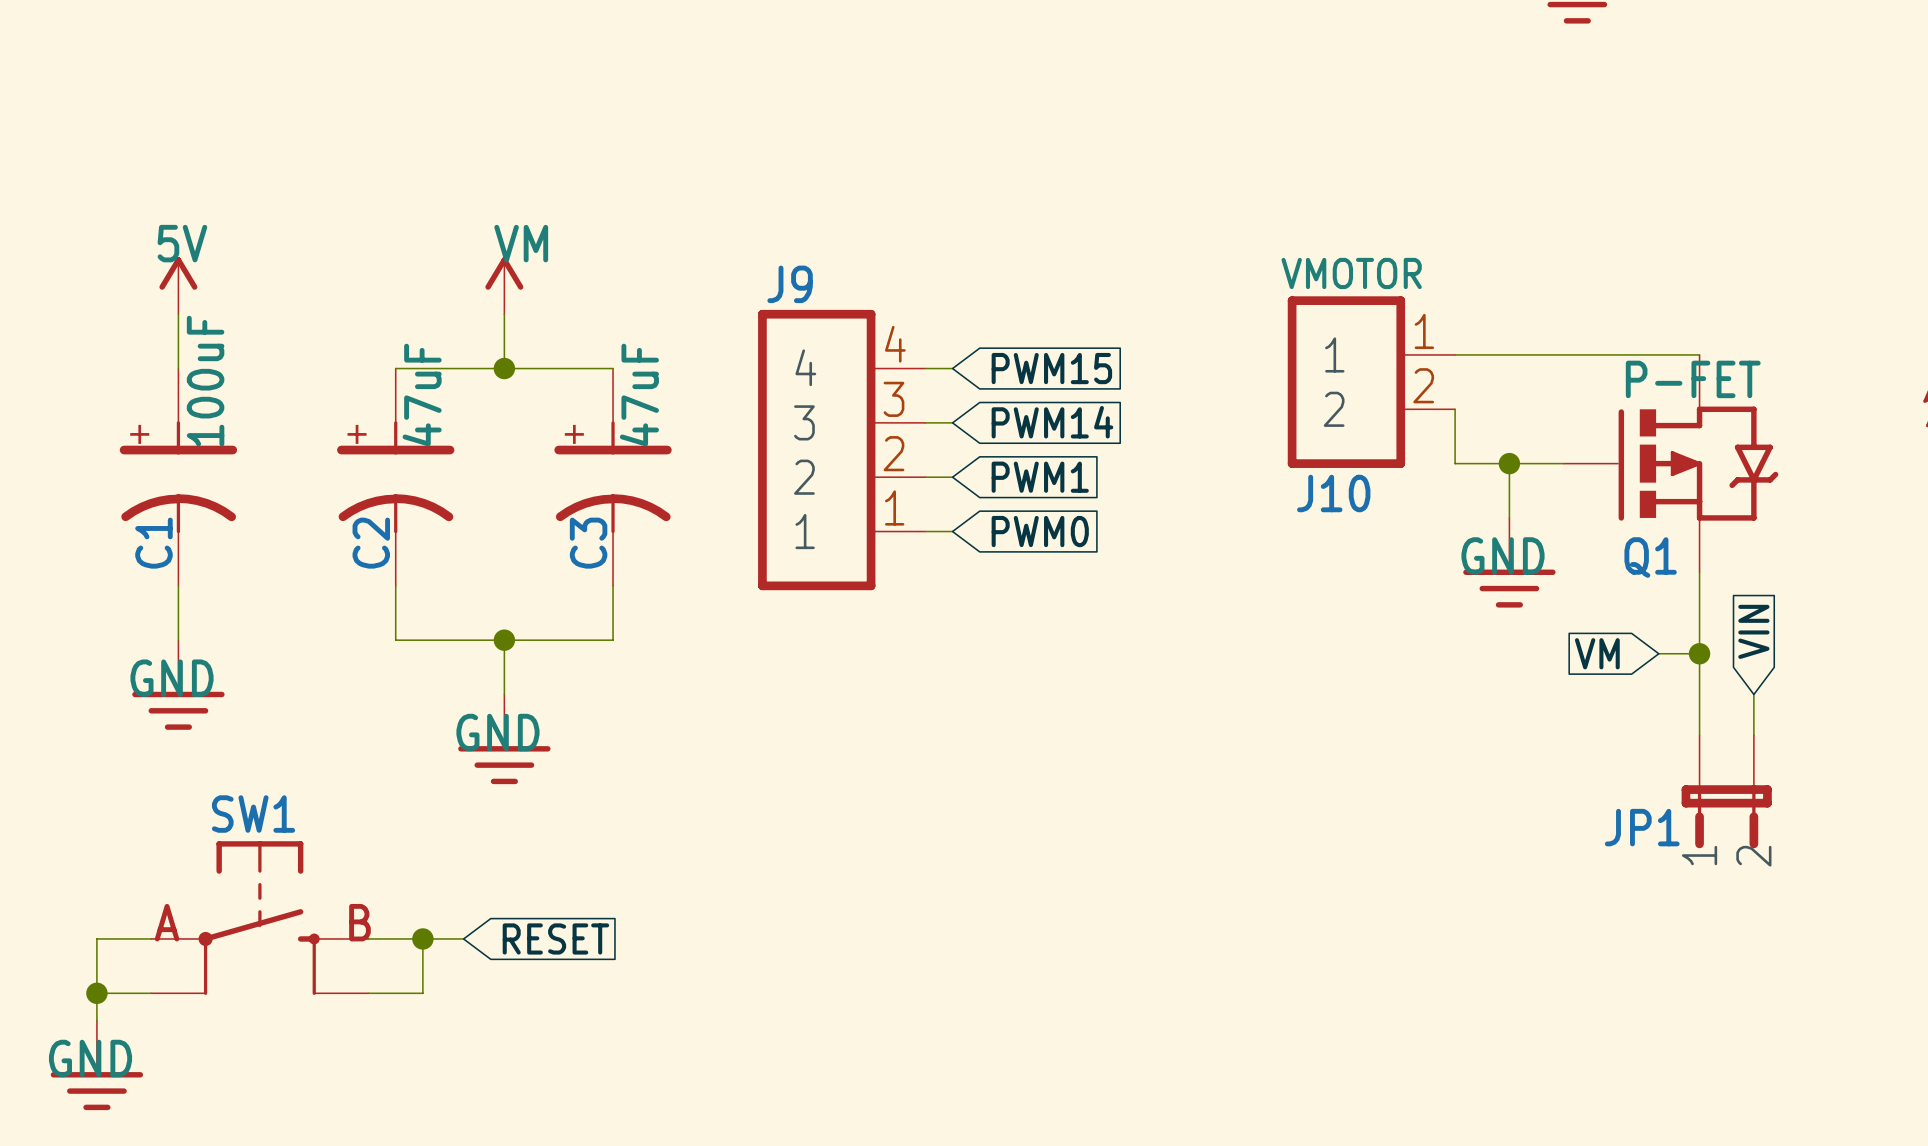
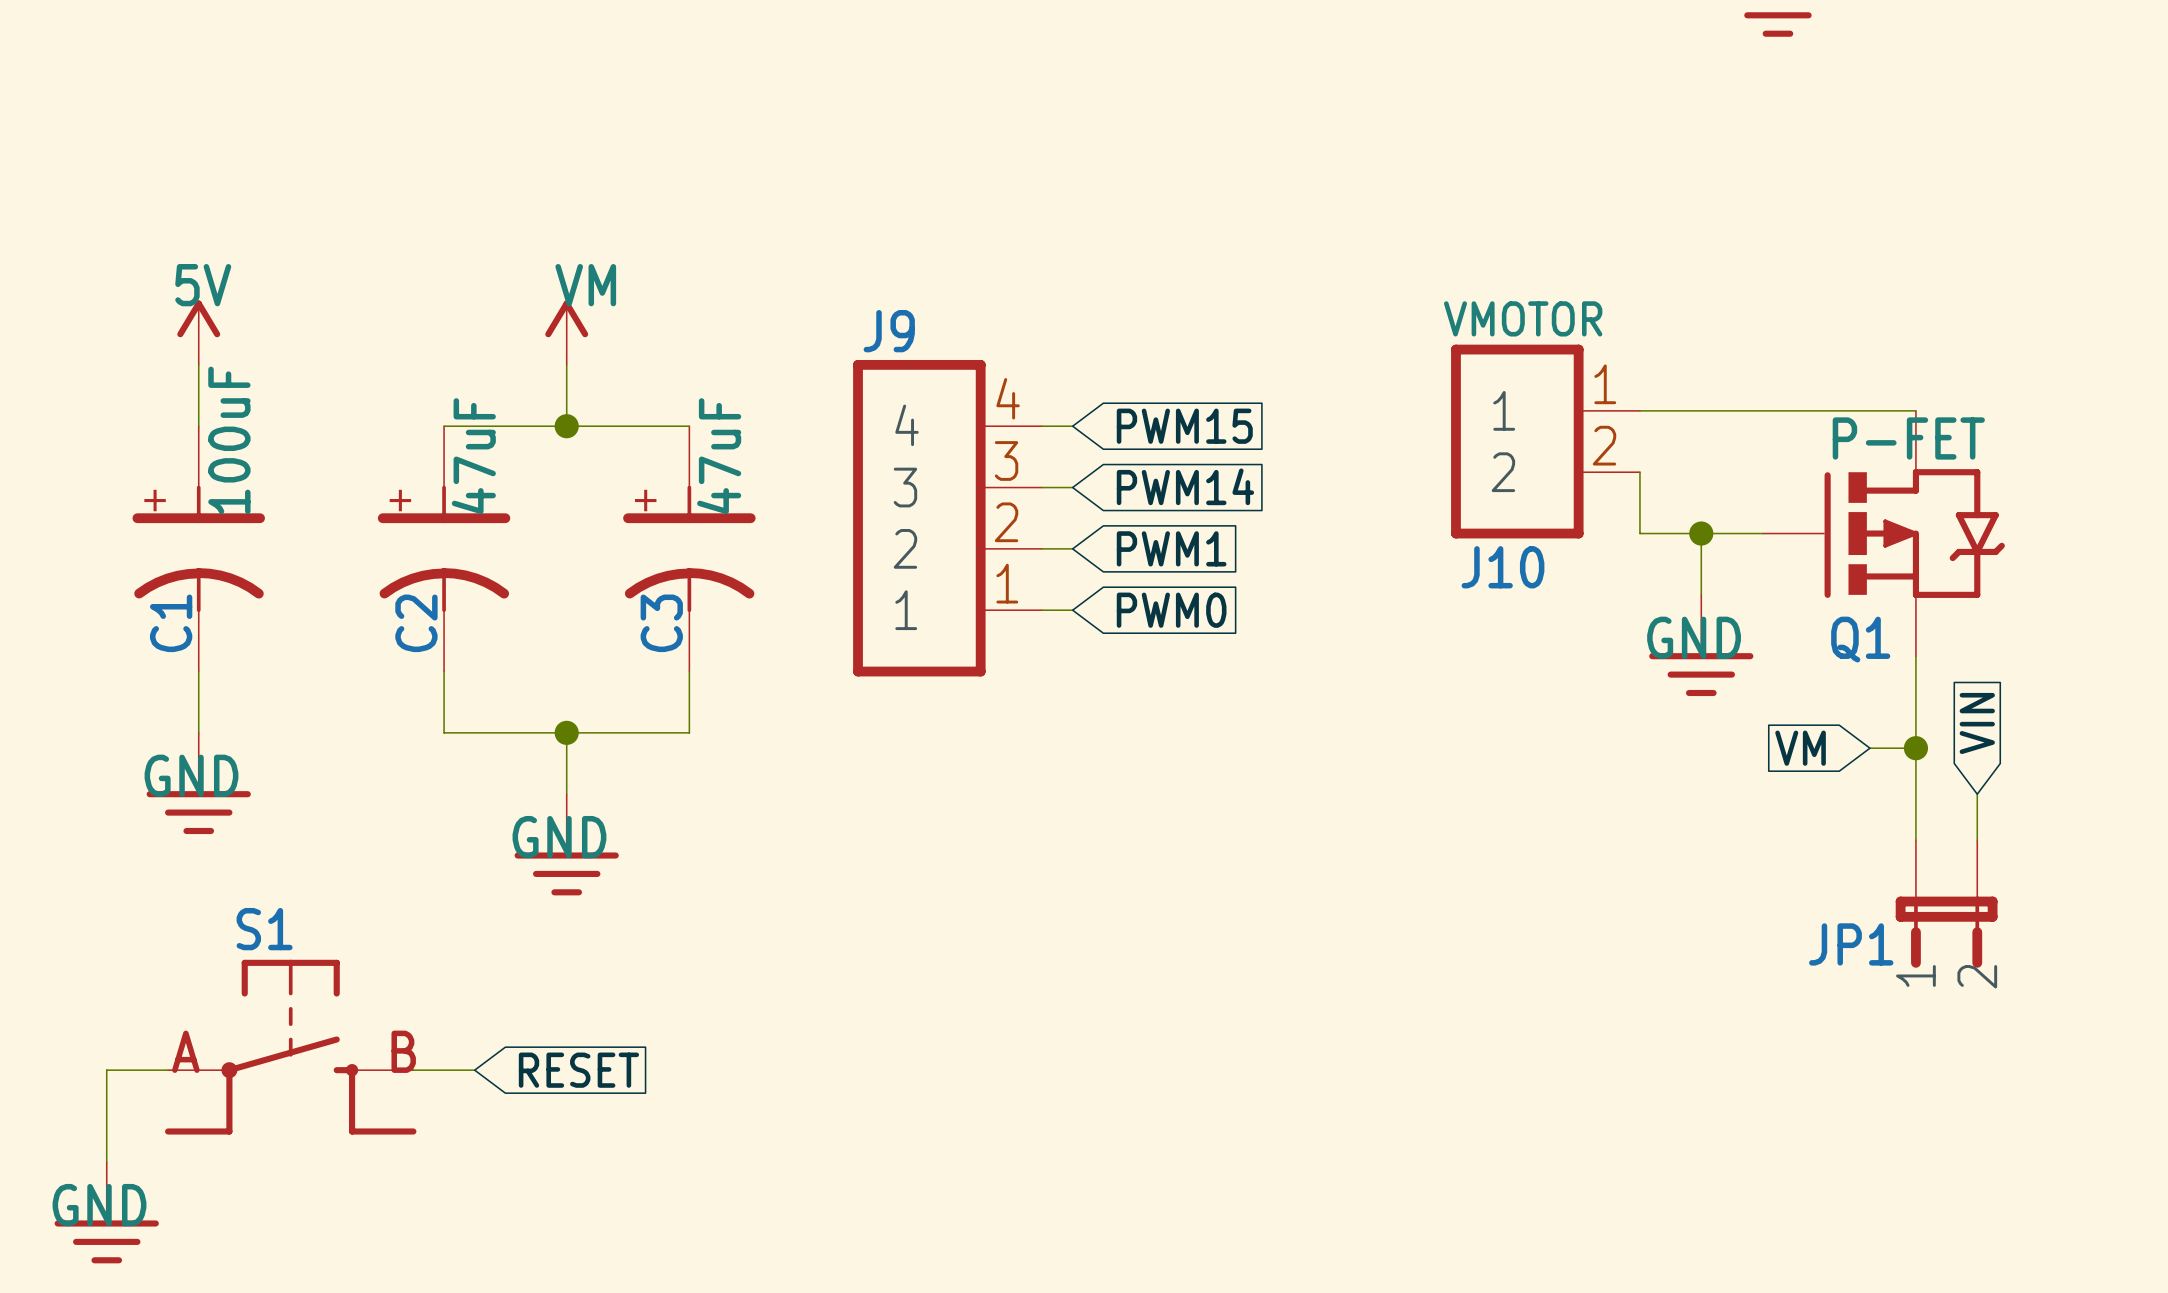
SW1: (259, 918) -> none
S1: none -> (290, 1047)
junction: (422, 938) -> none
wire: (463, 938) (422, 938) (422, 993) (368, 993) -> none
global label position: RESET (555, 938) -> RESET (578, 1070)
wire: (96, 993) (151, 993) -> none
junction: (96, 993) -> none

